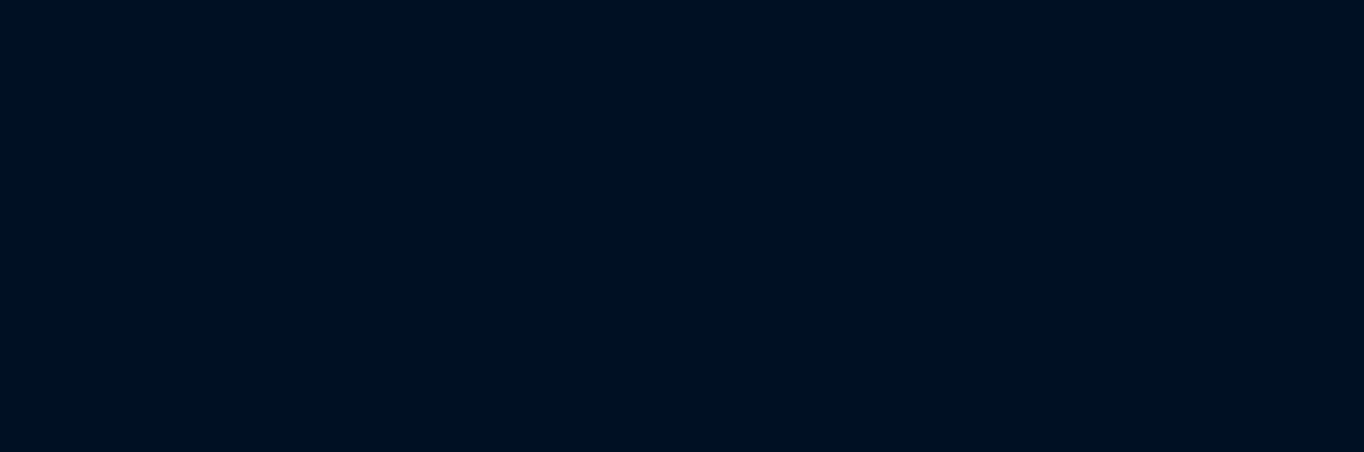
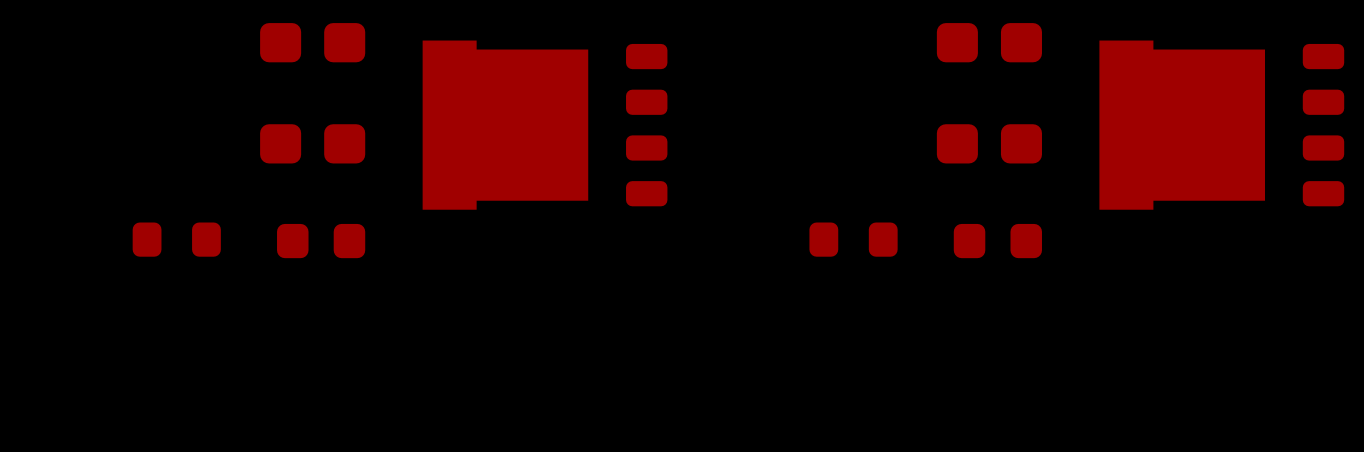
part: none -> (312, 42)
part: none -> (989, 42)
part: none -> (545, 125)
part: none -> (1221, 125)
part: none -> (312, 143)
part: none -> (989, 143)
part: none -> (176, 239)
part: none -> (853, 239)
part: none -> (321, 241)
part: none -> (997, 241)

